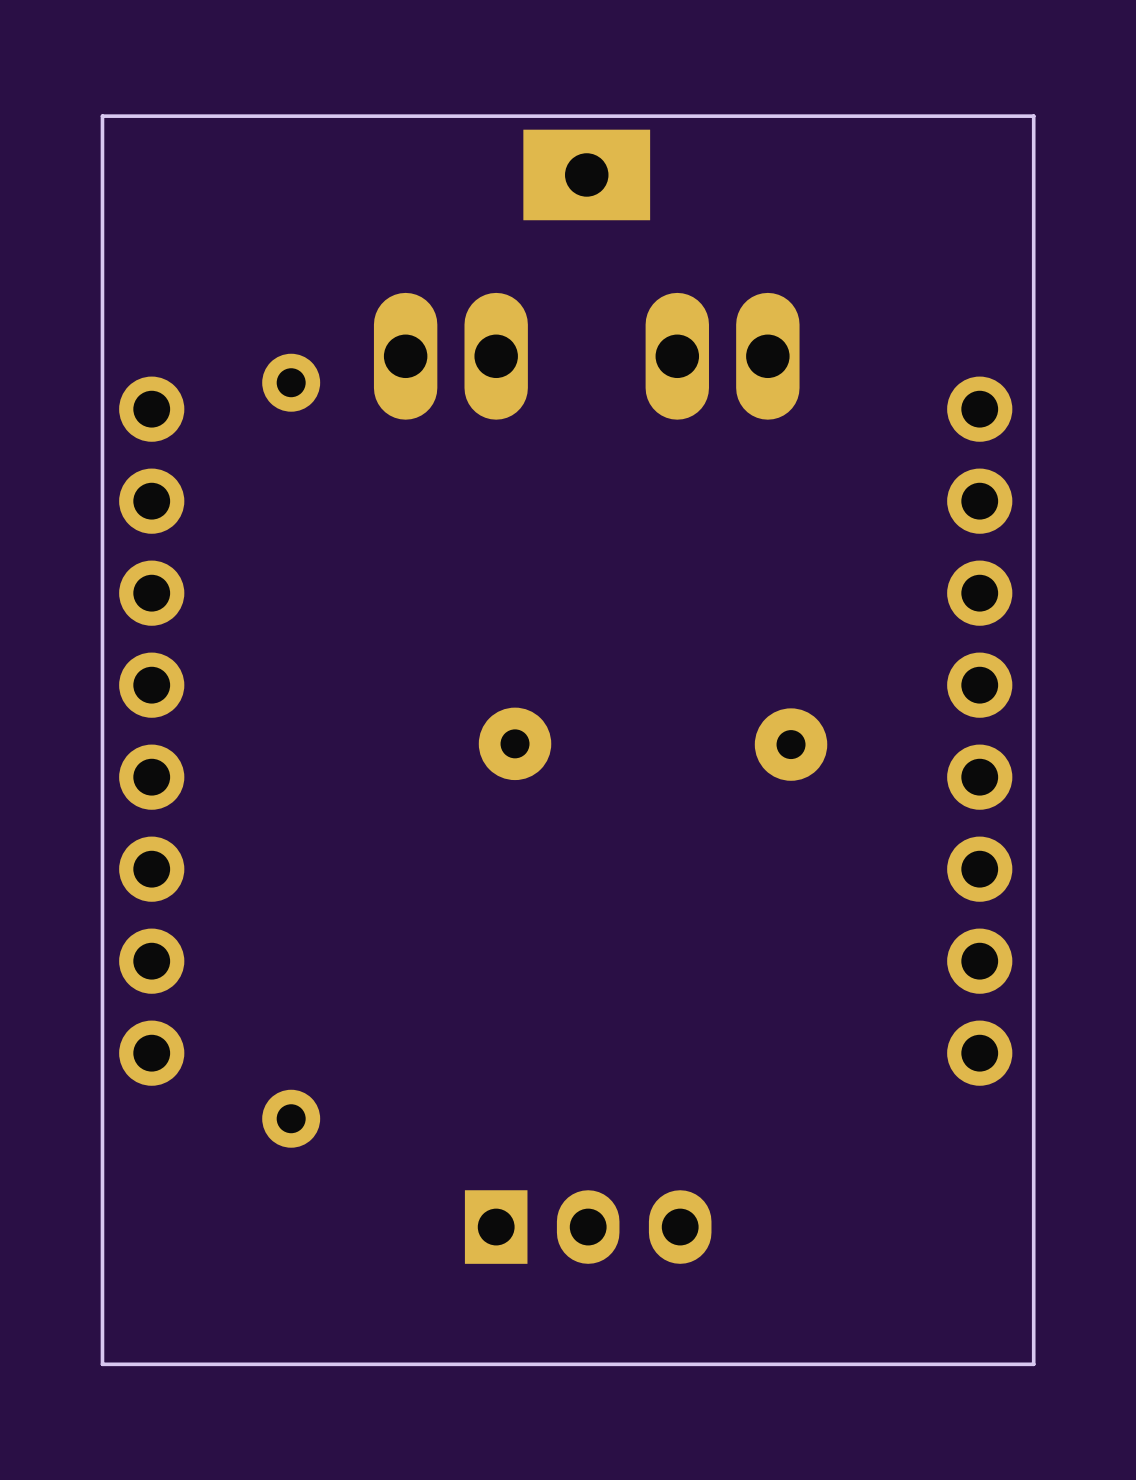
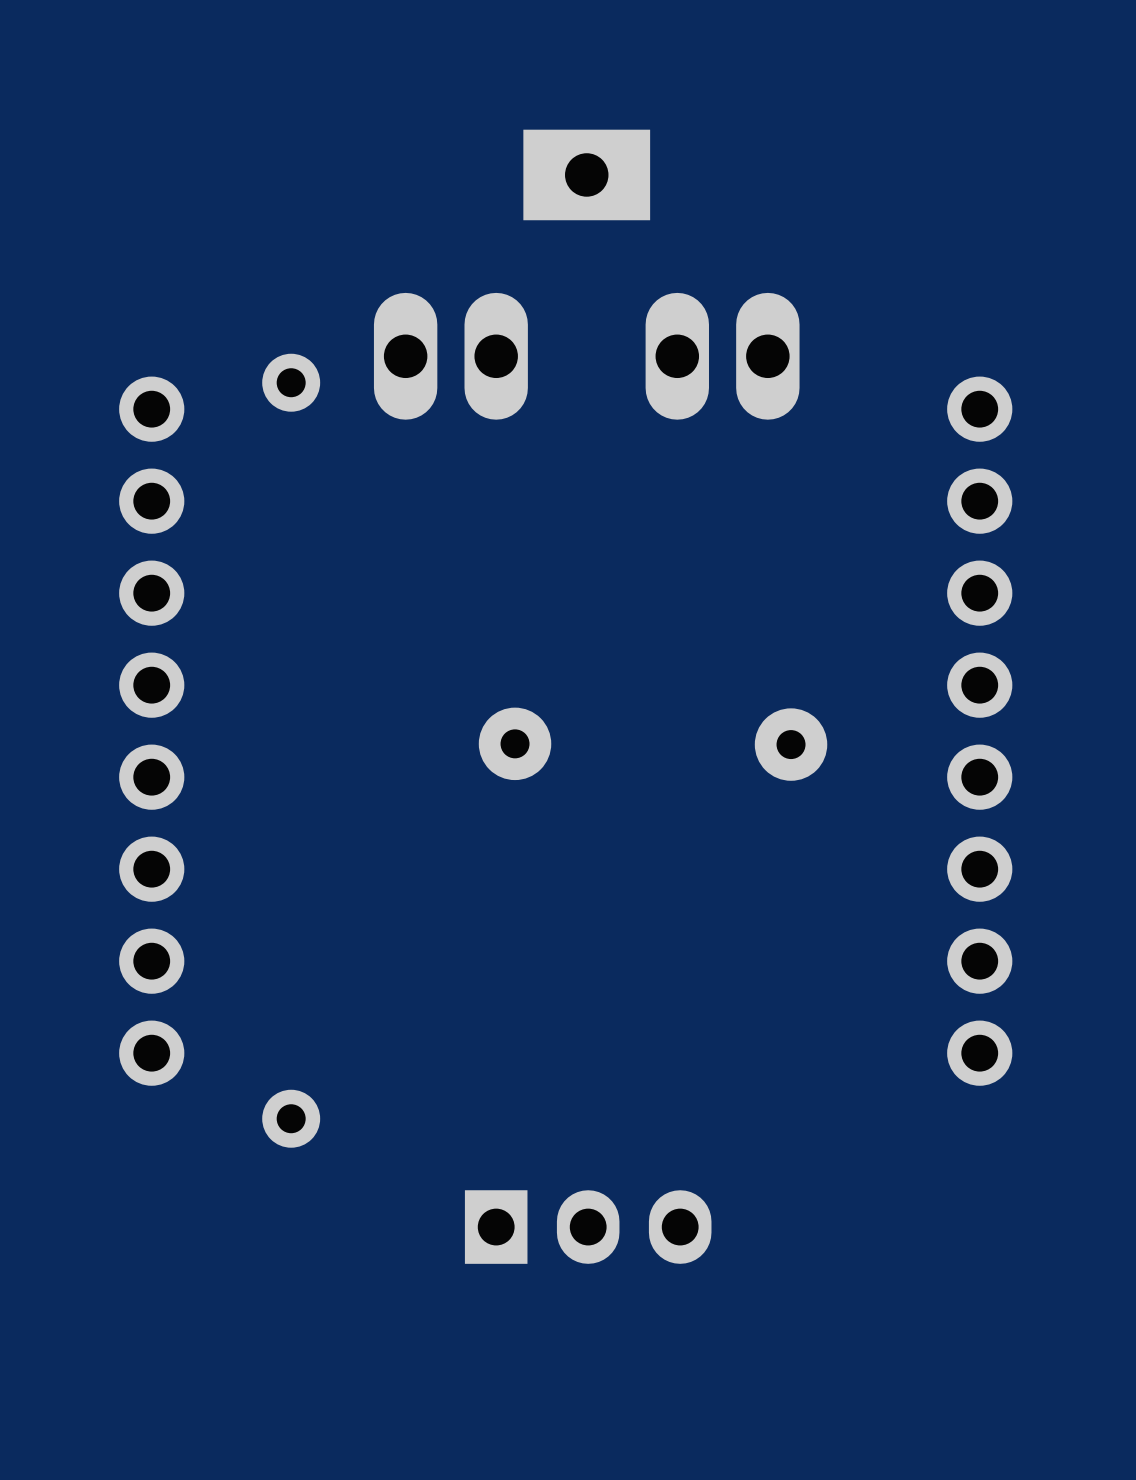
board edge: (1033, 116) (102, 116) (102, 1364) (1033, 1364) (1033, 116) -> none

